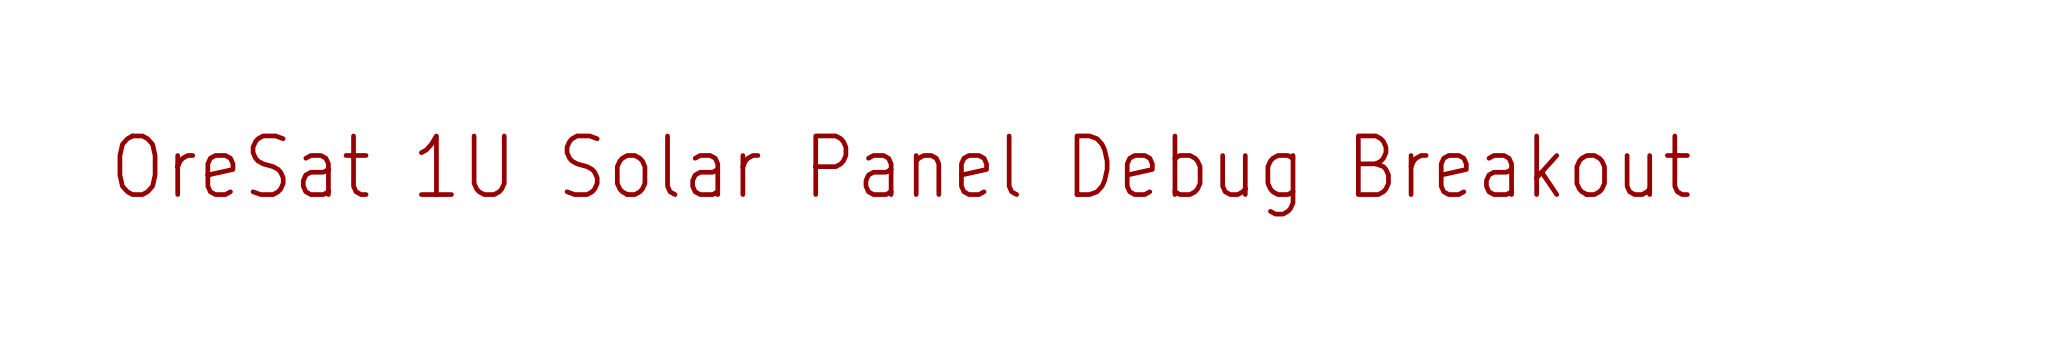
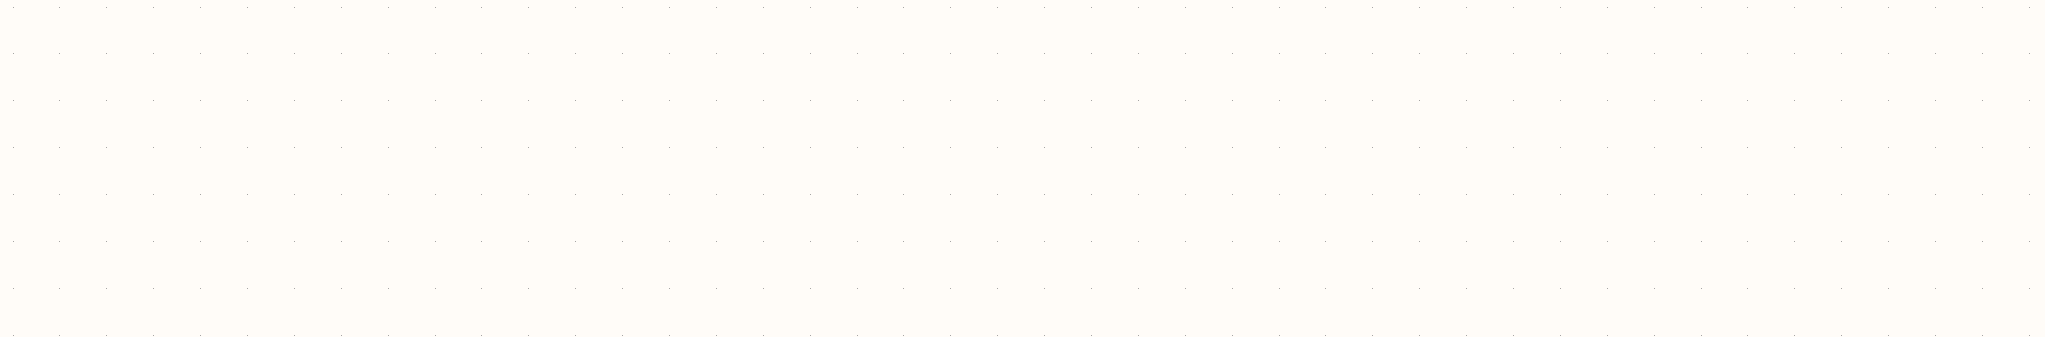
text: OreSat 1U Solar Panel Debug Breakout (903, 175) -> none

